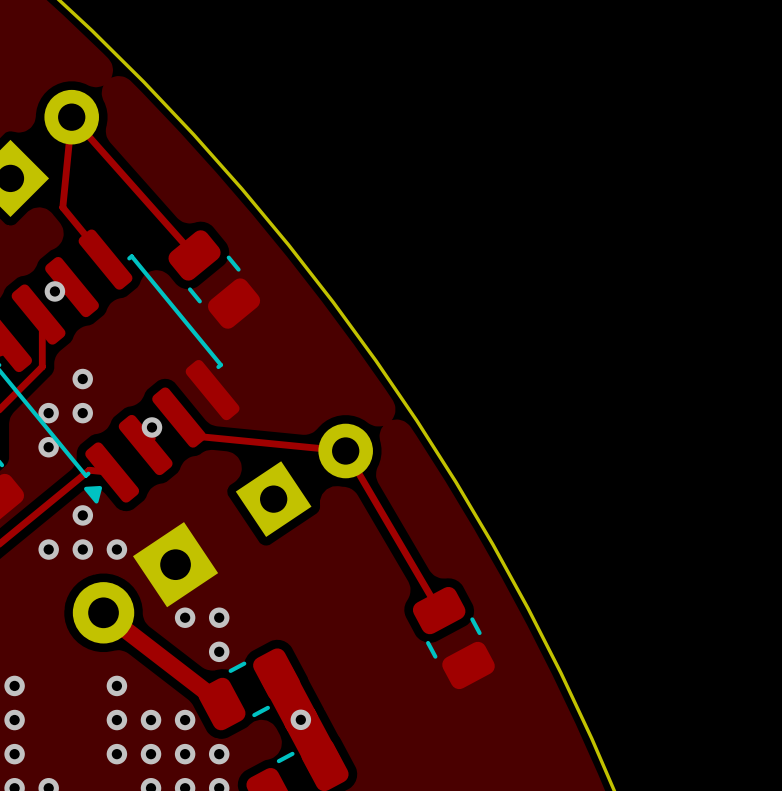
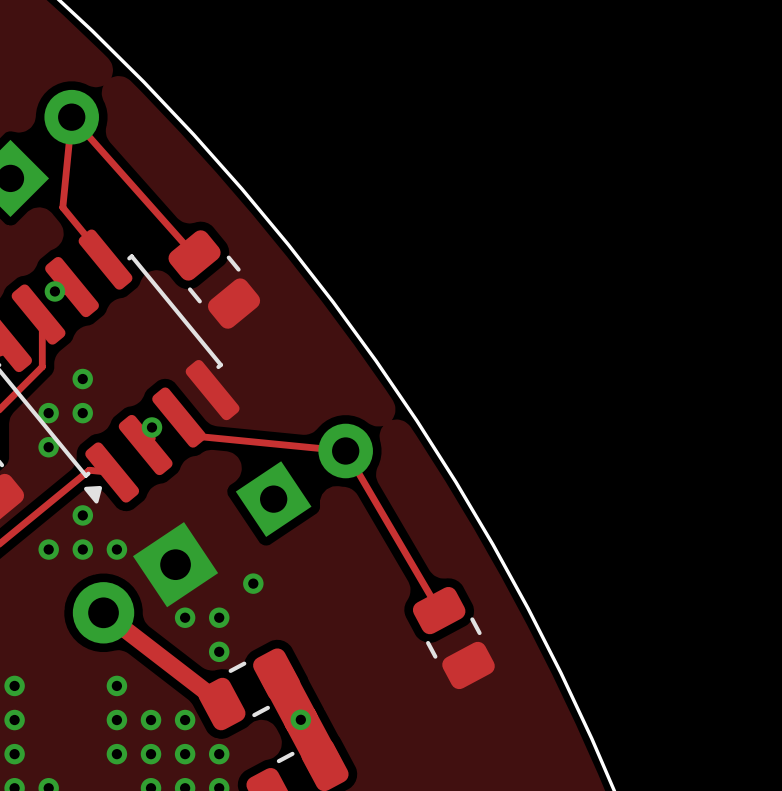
via: none -> (253, 583)

